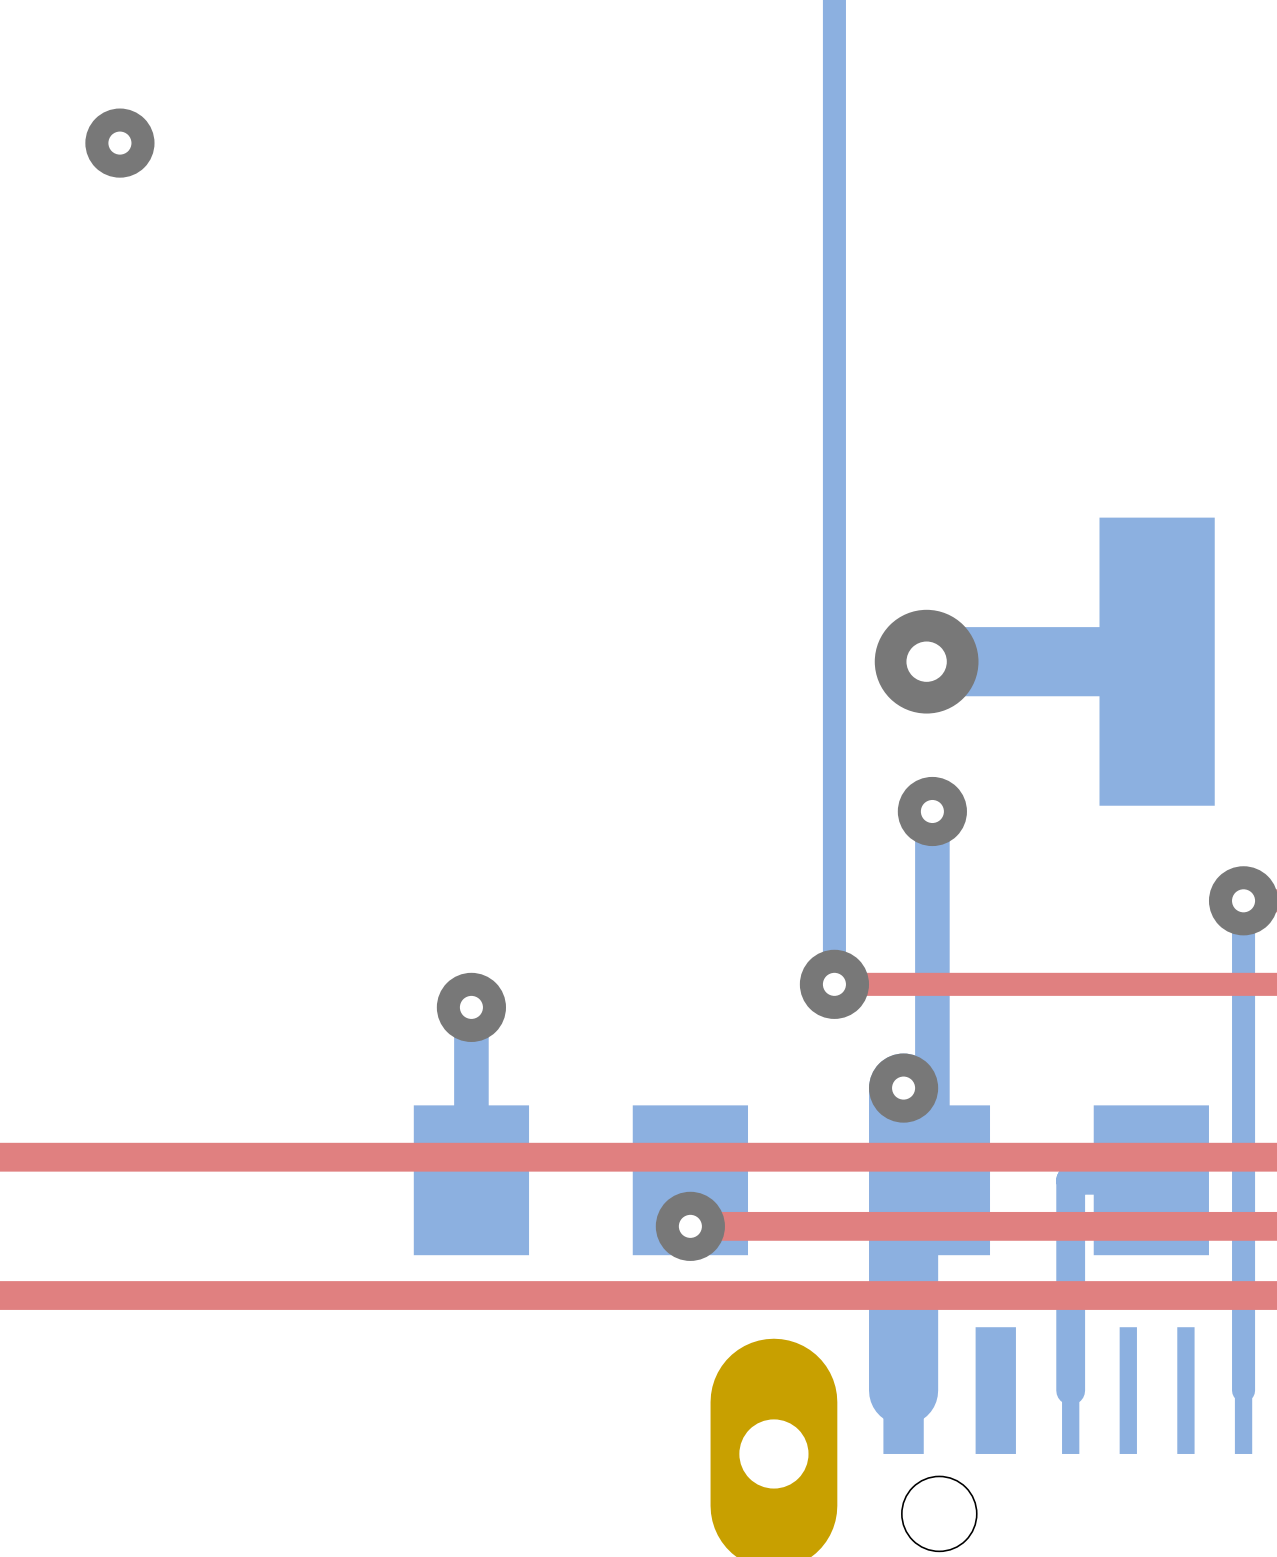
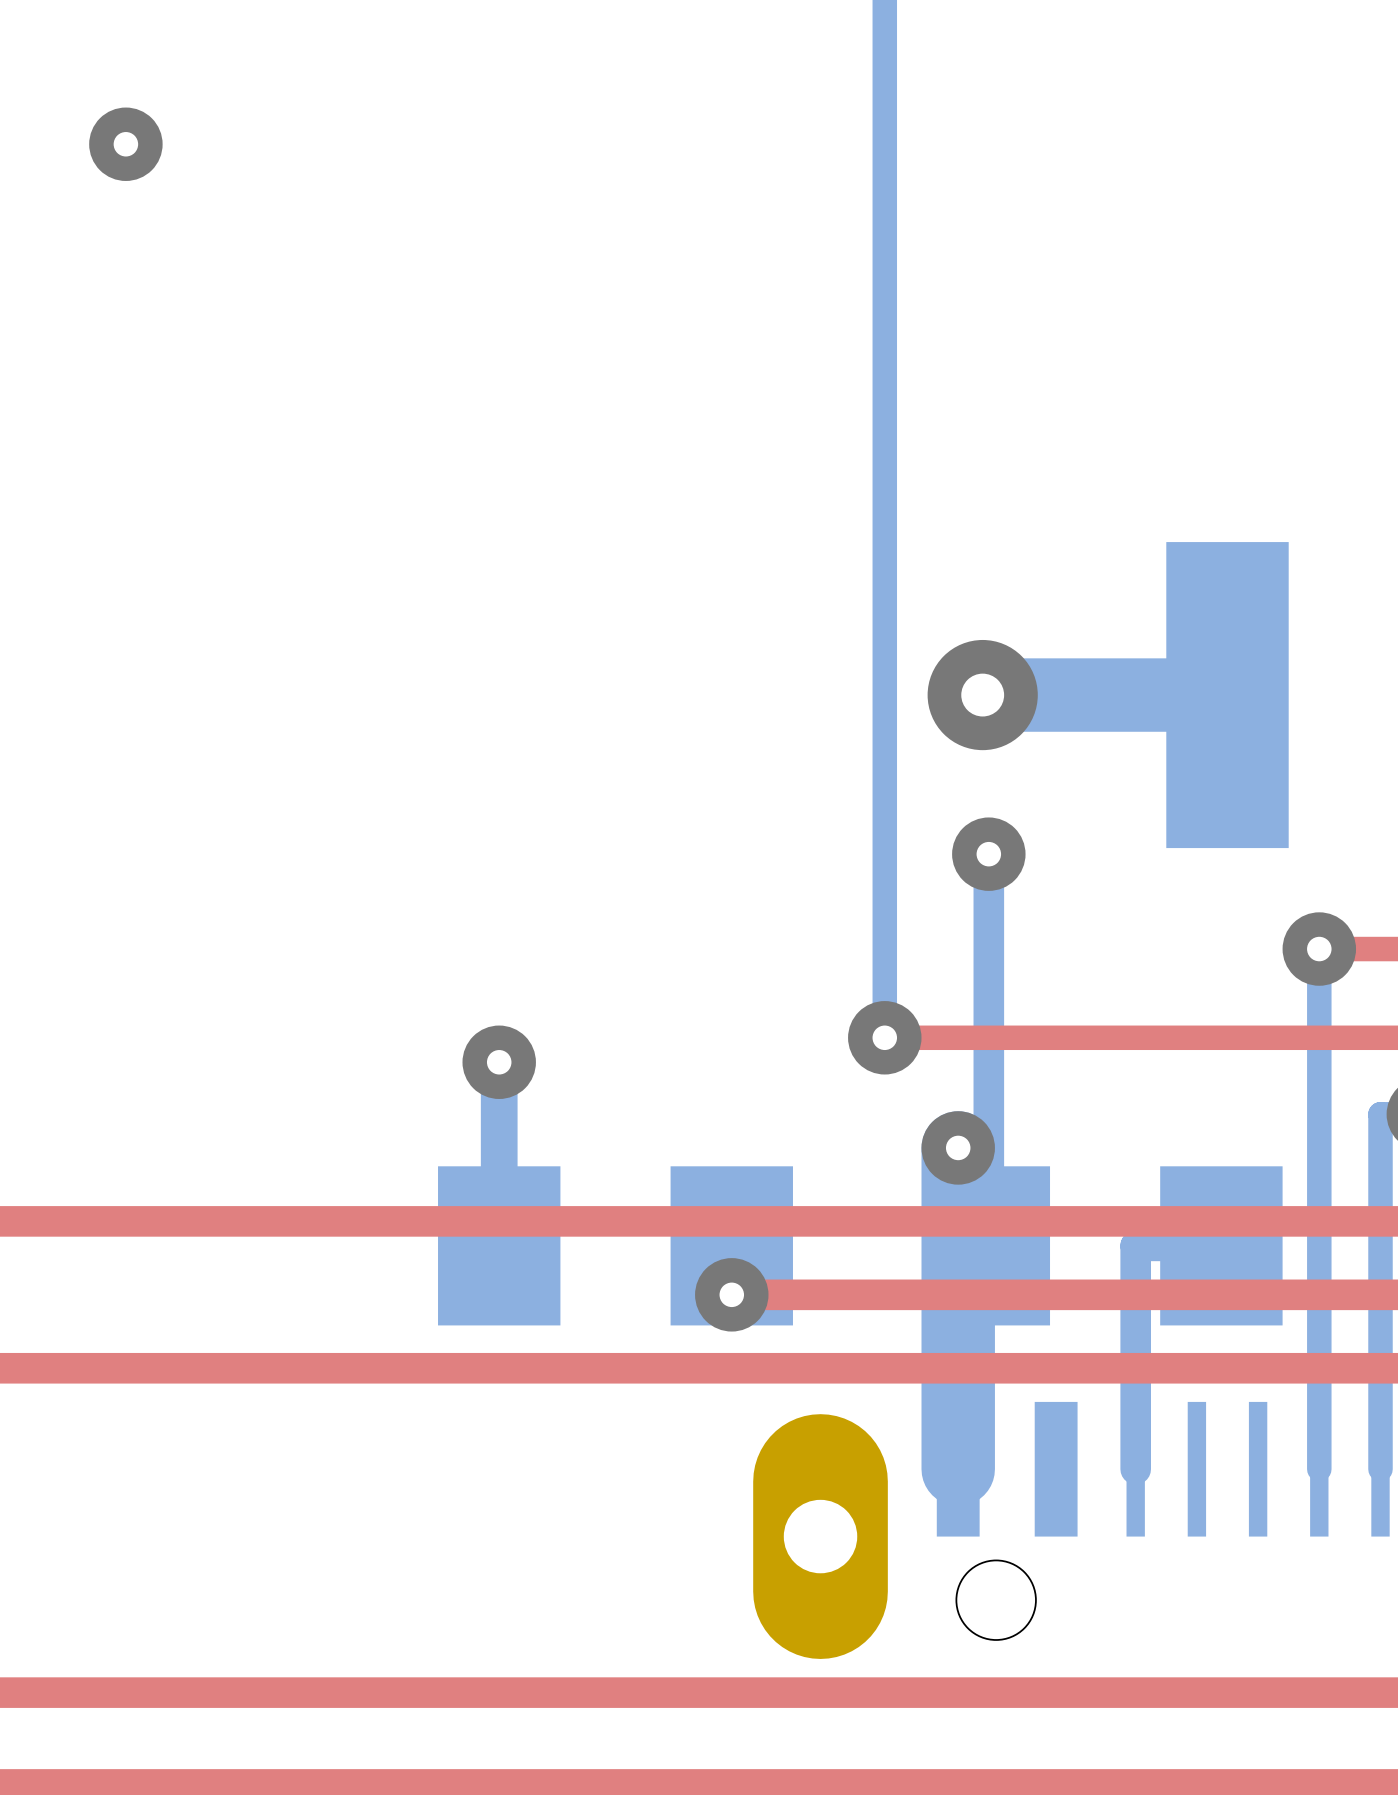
bottom track width: thick (932, 811) (932, 1180) -> thin (988, 854) (988, 1245)

